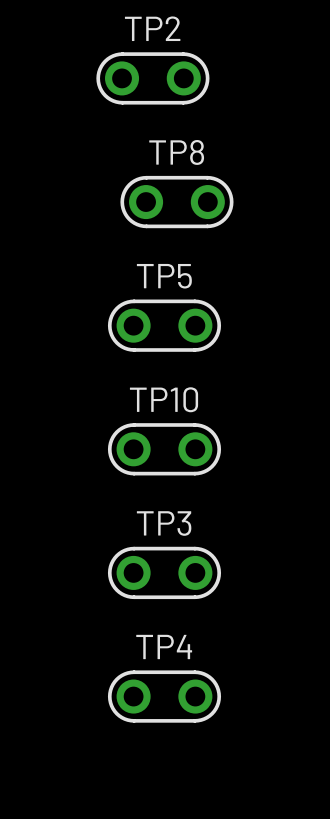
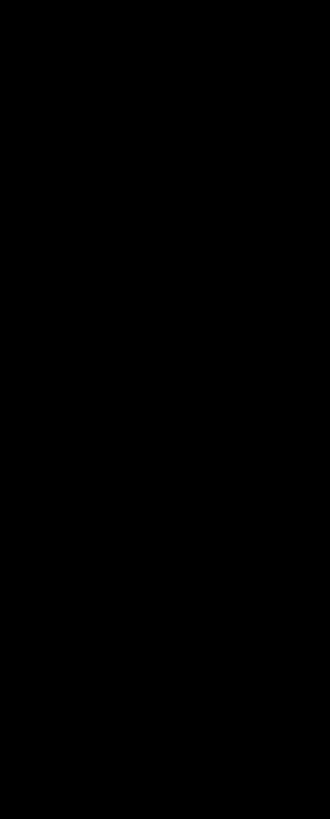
TP2: (152, 78) -> none
TP8: (176, 202) -> none
TP5: (164, 325) -> none
TP10: (164, 449) -> none
TP3: (164, 572) -> none
TP4: (164, 696) -> none

